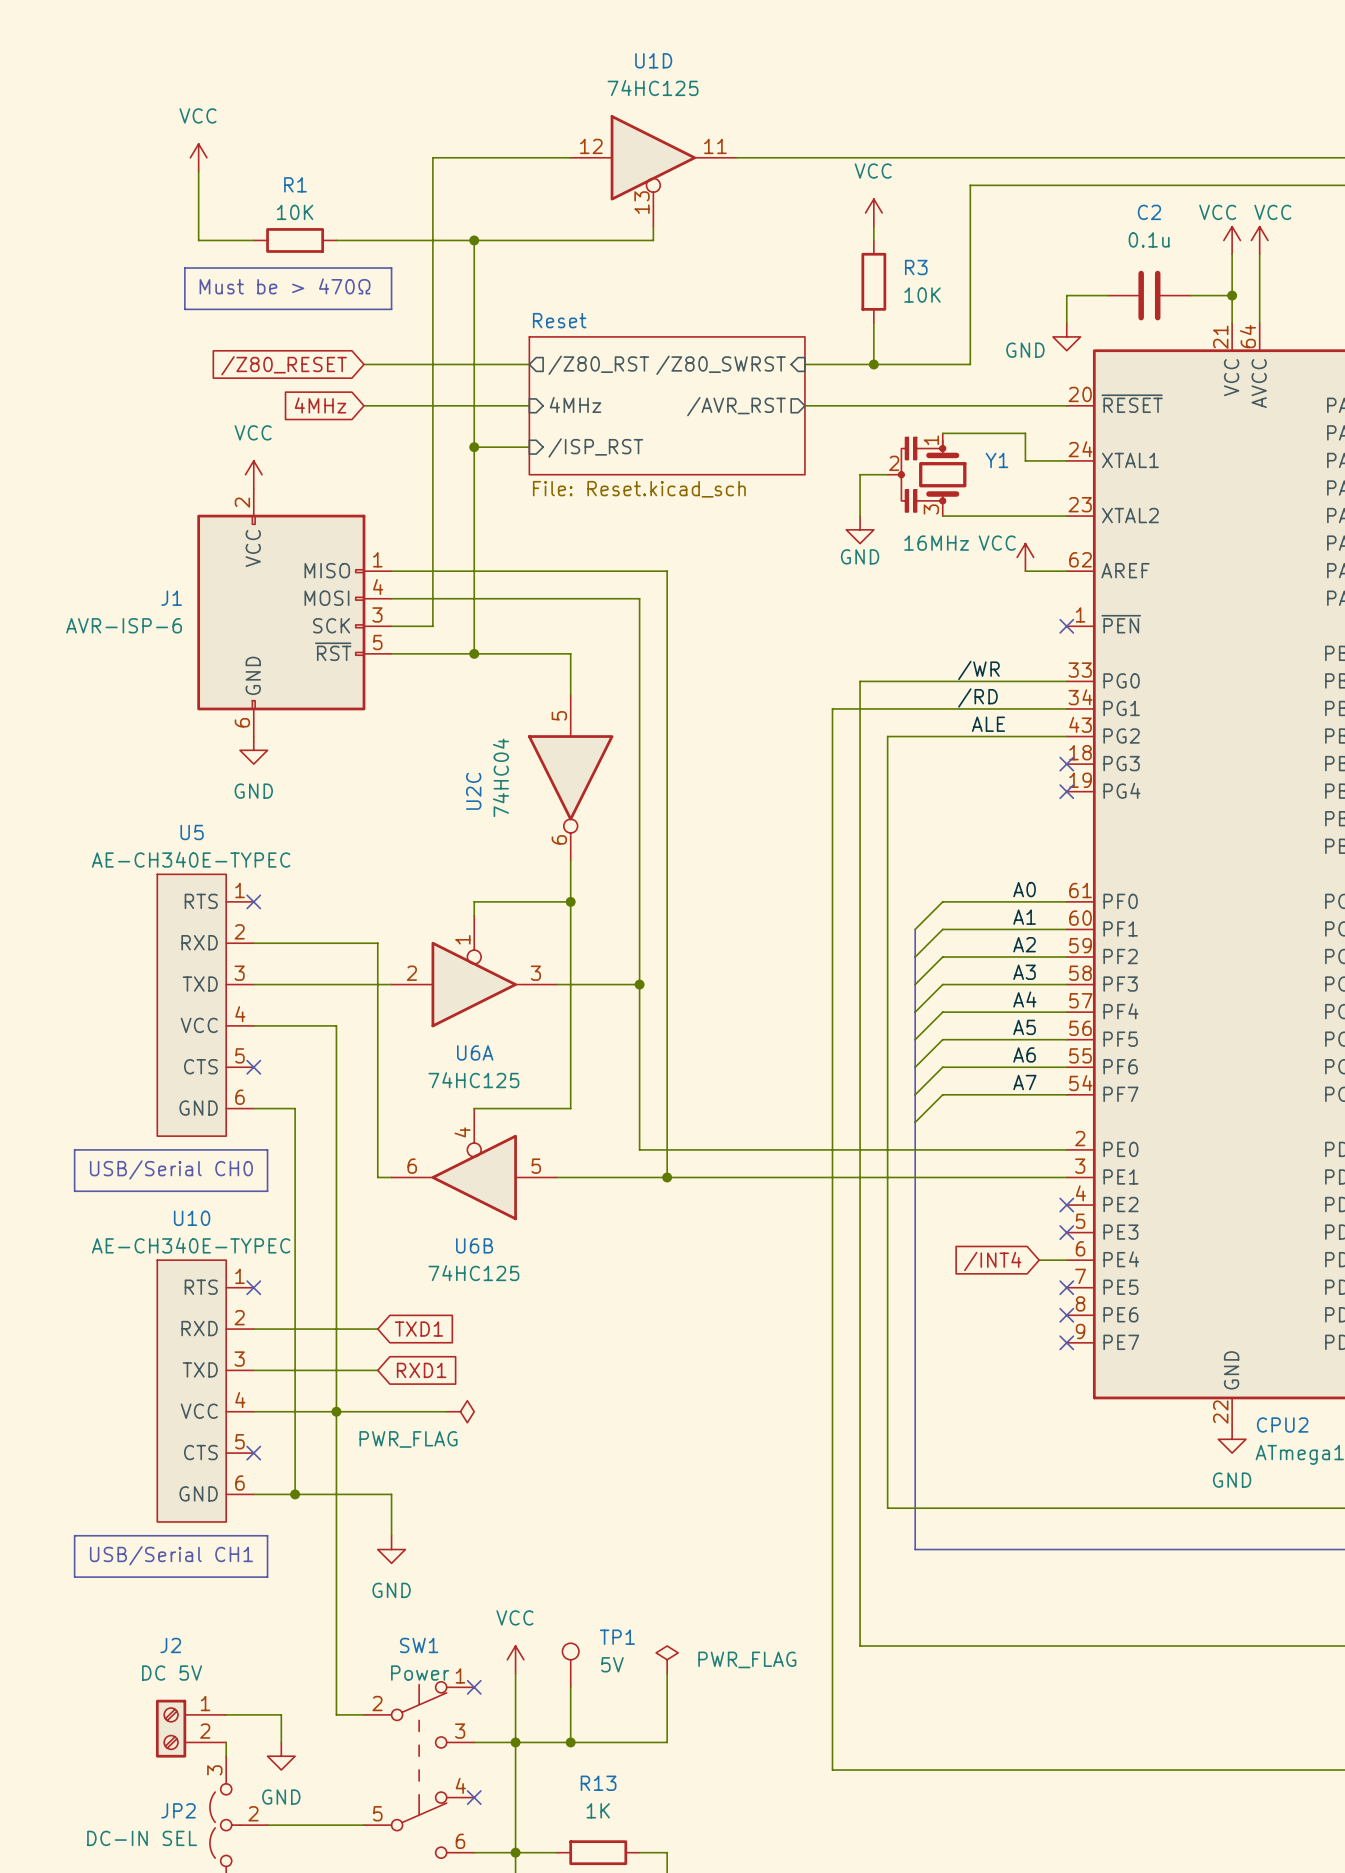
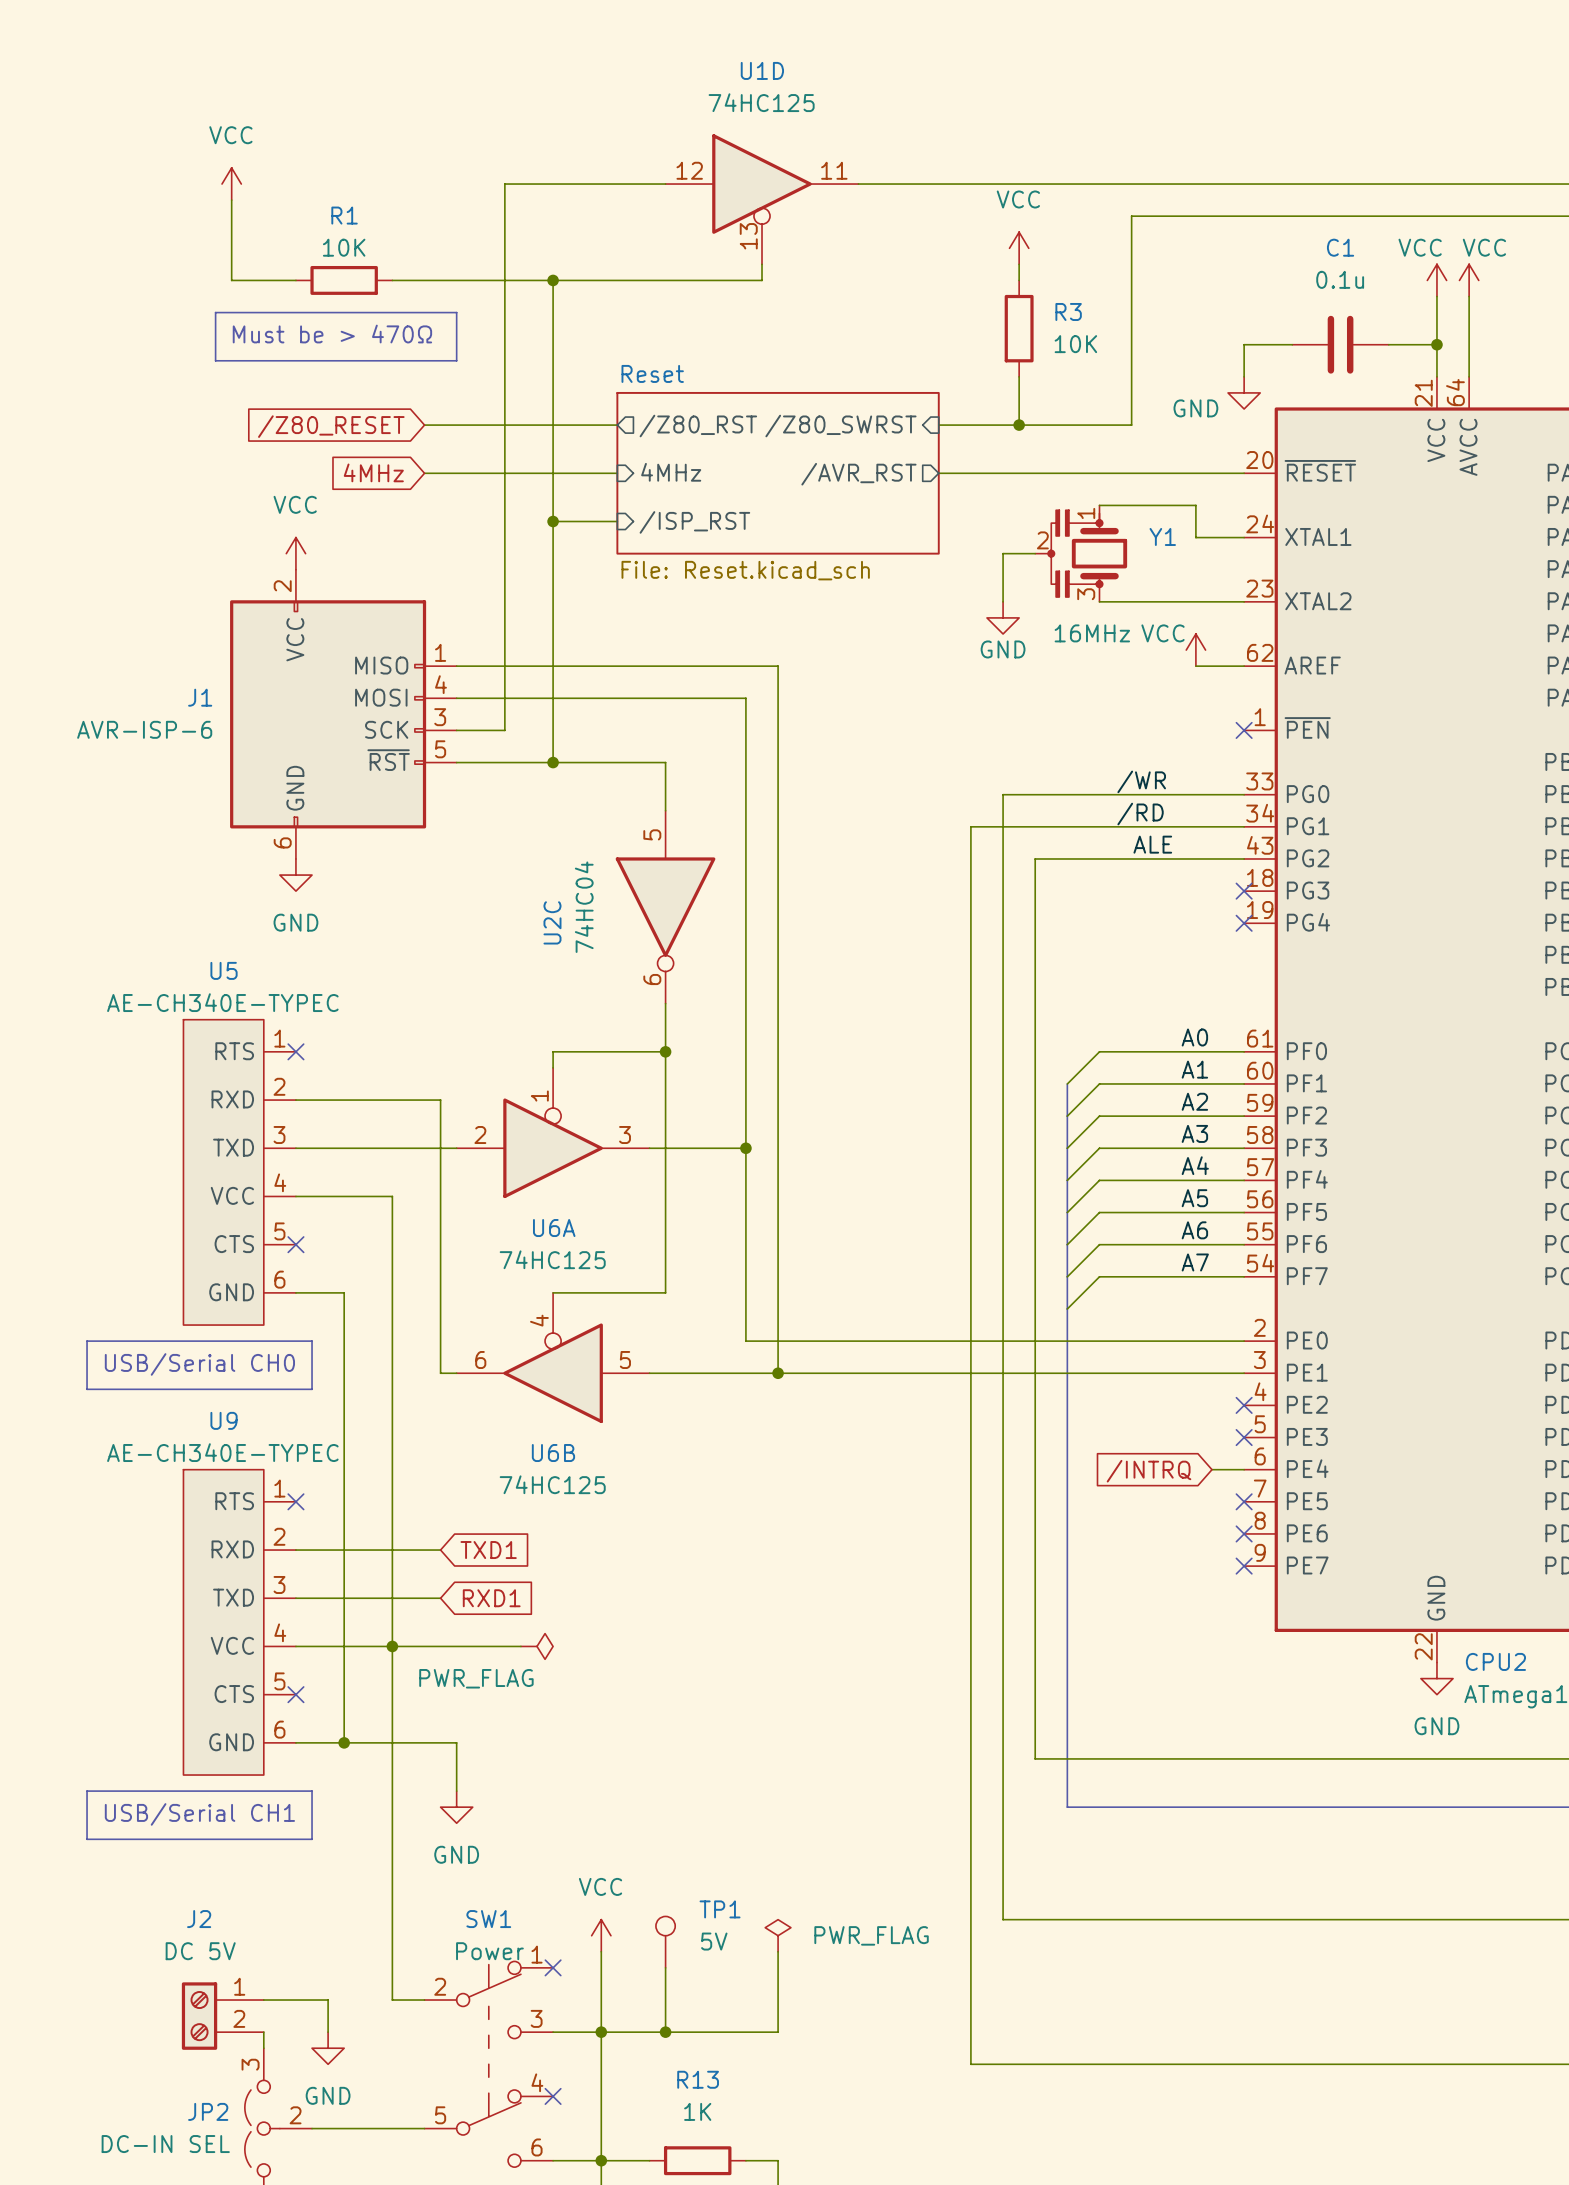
C2 name: C2 (1149, 212) -> C1 (1340, 247)
U10 name: U10 (192, 1218) -> U9 (224, 1420)
global label: /INT4 (992, 1261) -> /INTRQ (1149, 1471)

